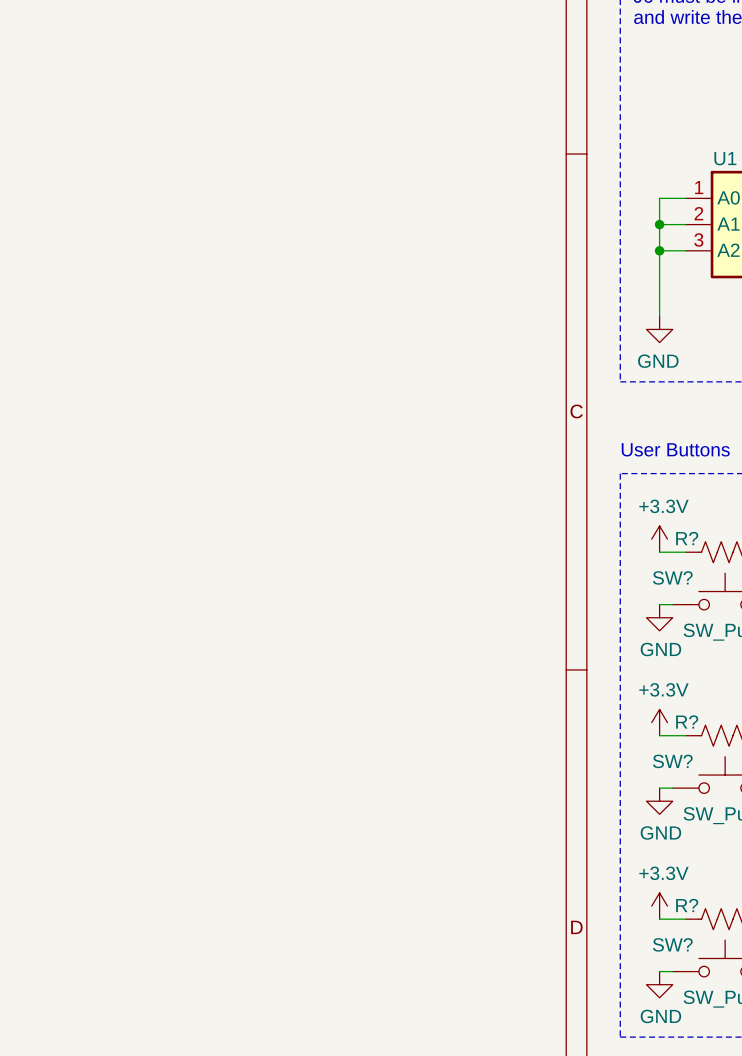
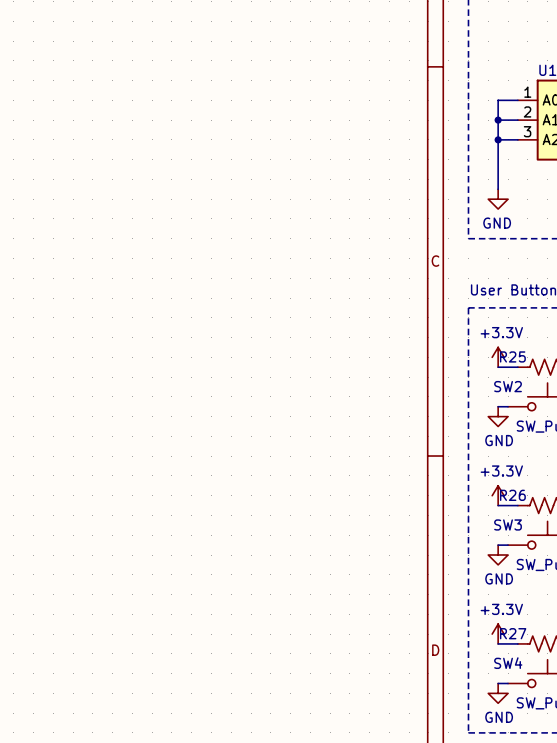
R? name: R? (687, 538) -> R25 (512, 356)
SW? name: SW? (672, 577) -> SW2 (508, 386)
R? name: R? (687, 722) -> R26 (512, 495)
SW? name: SW? (672, 761) -> SW3 (508, 524)
R? name: R? (687, 905) -> R27 (513, 633)
SW? name: SW? (672, 944) -> SW4 (508, 663)

